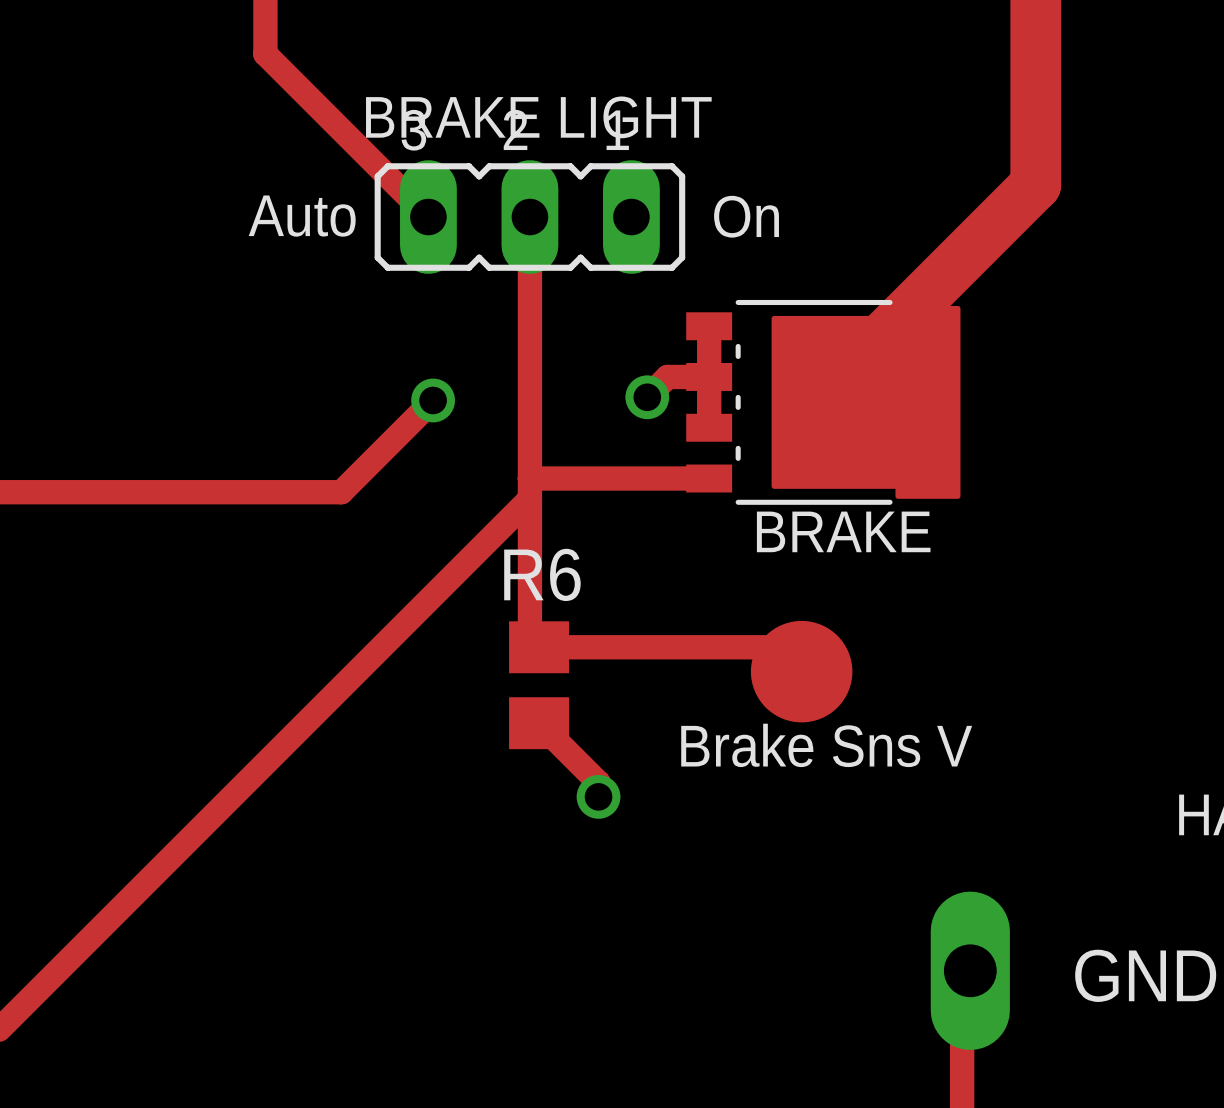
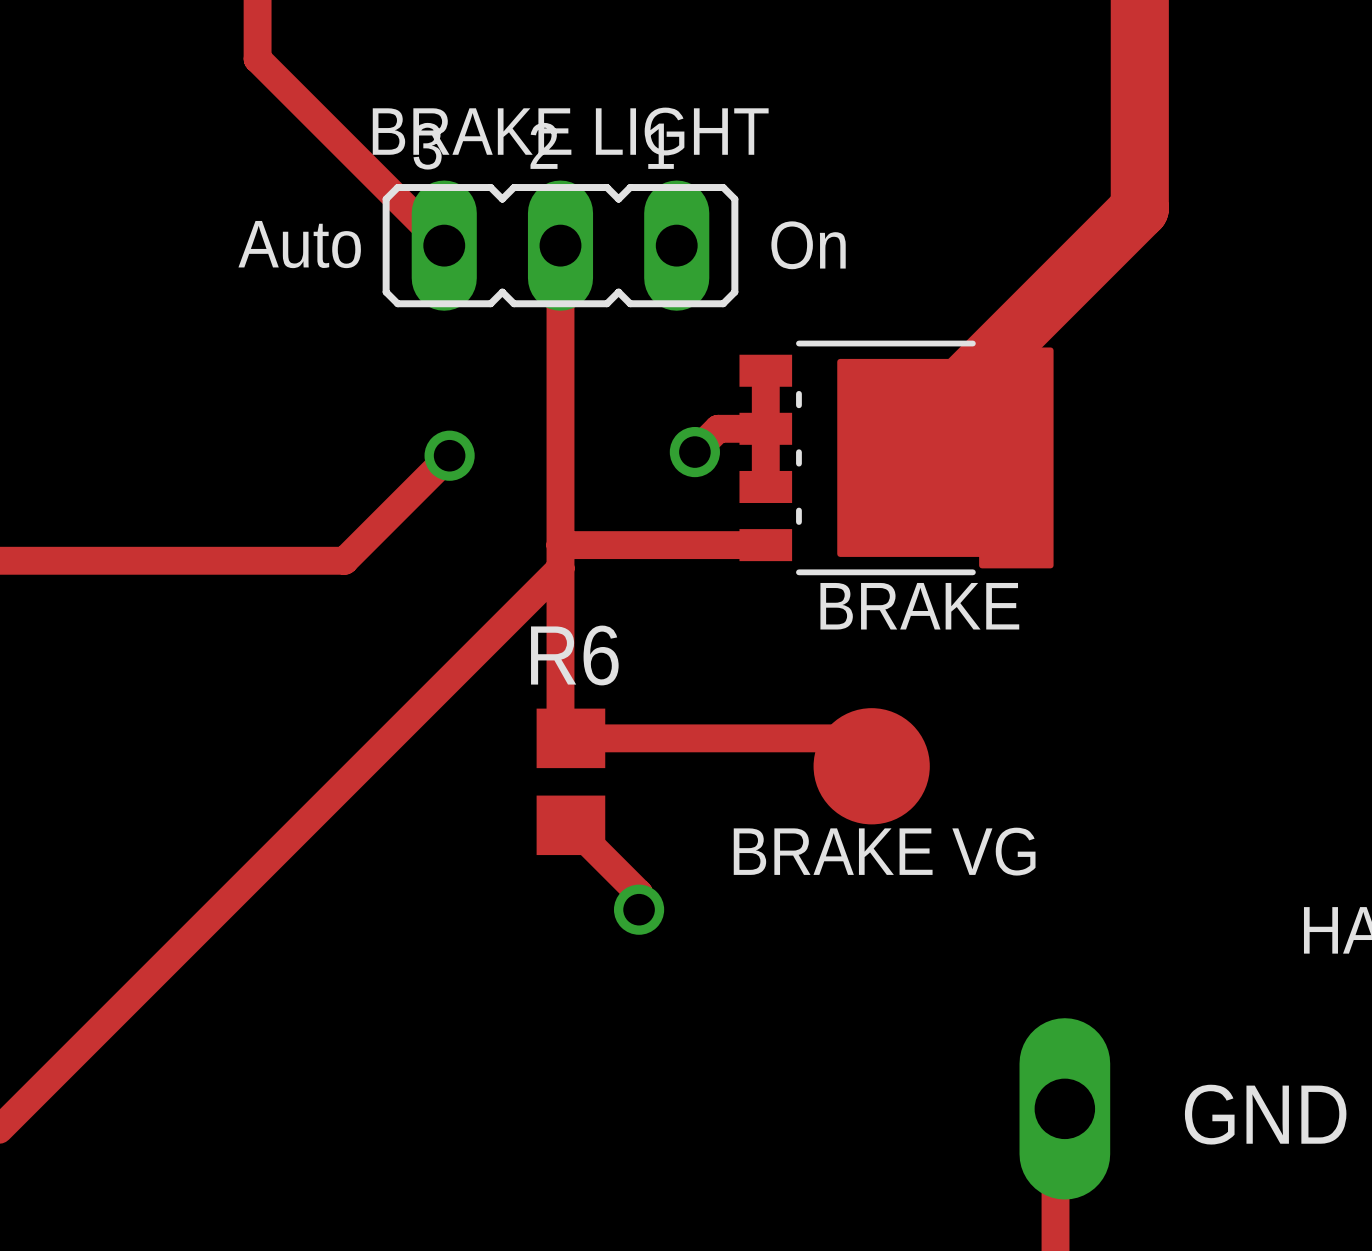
text: Brake Sns V (826, 745) -> BRAKE VG (884, 851)

